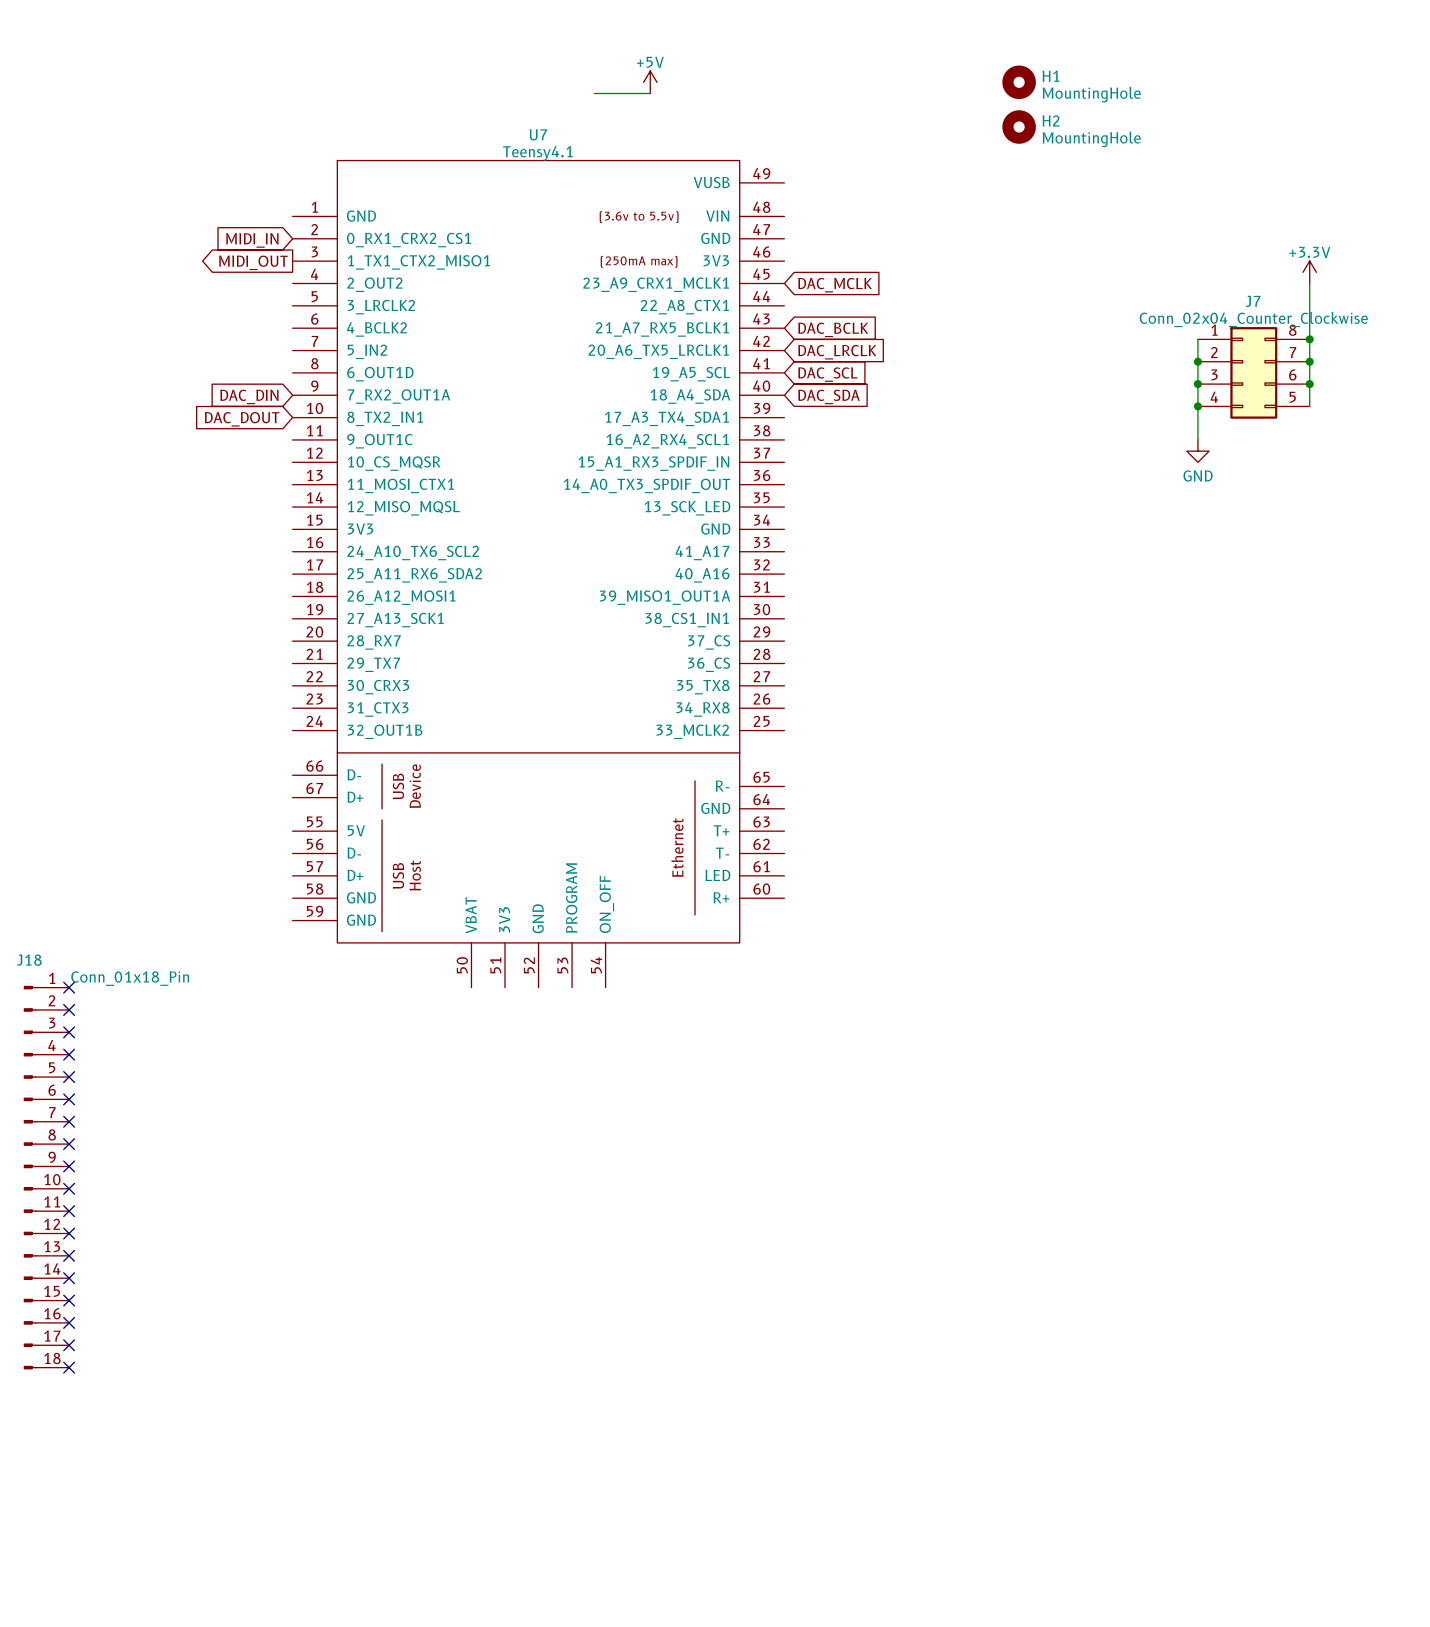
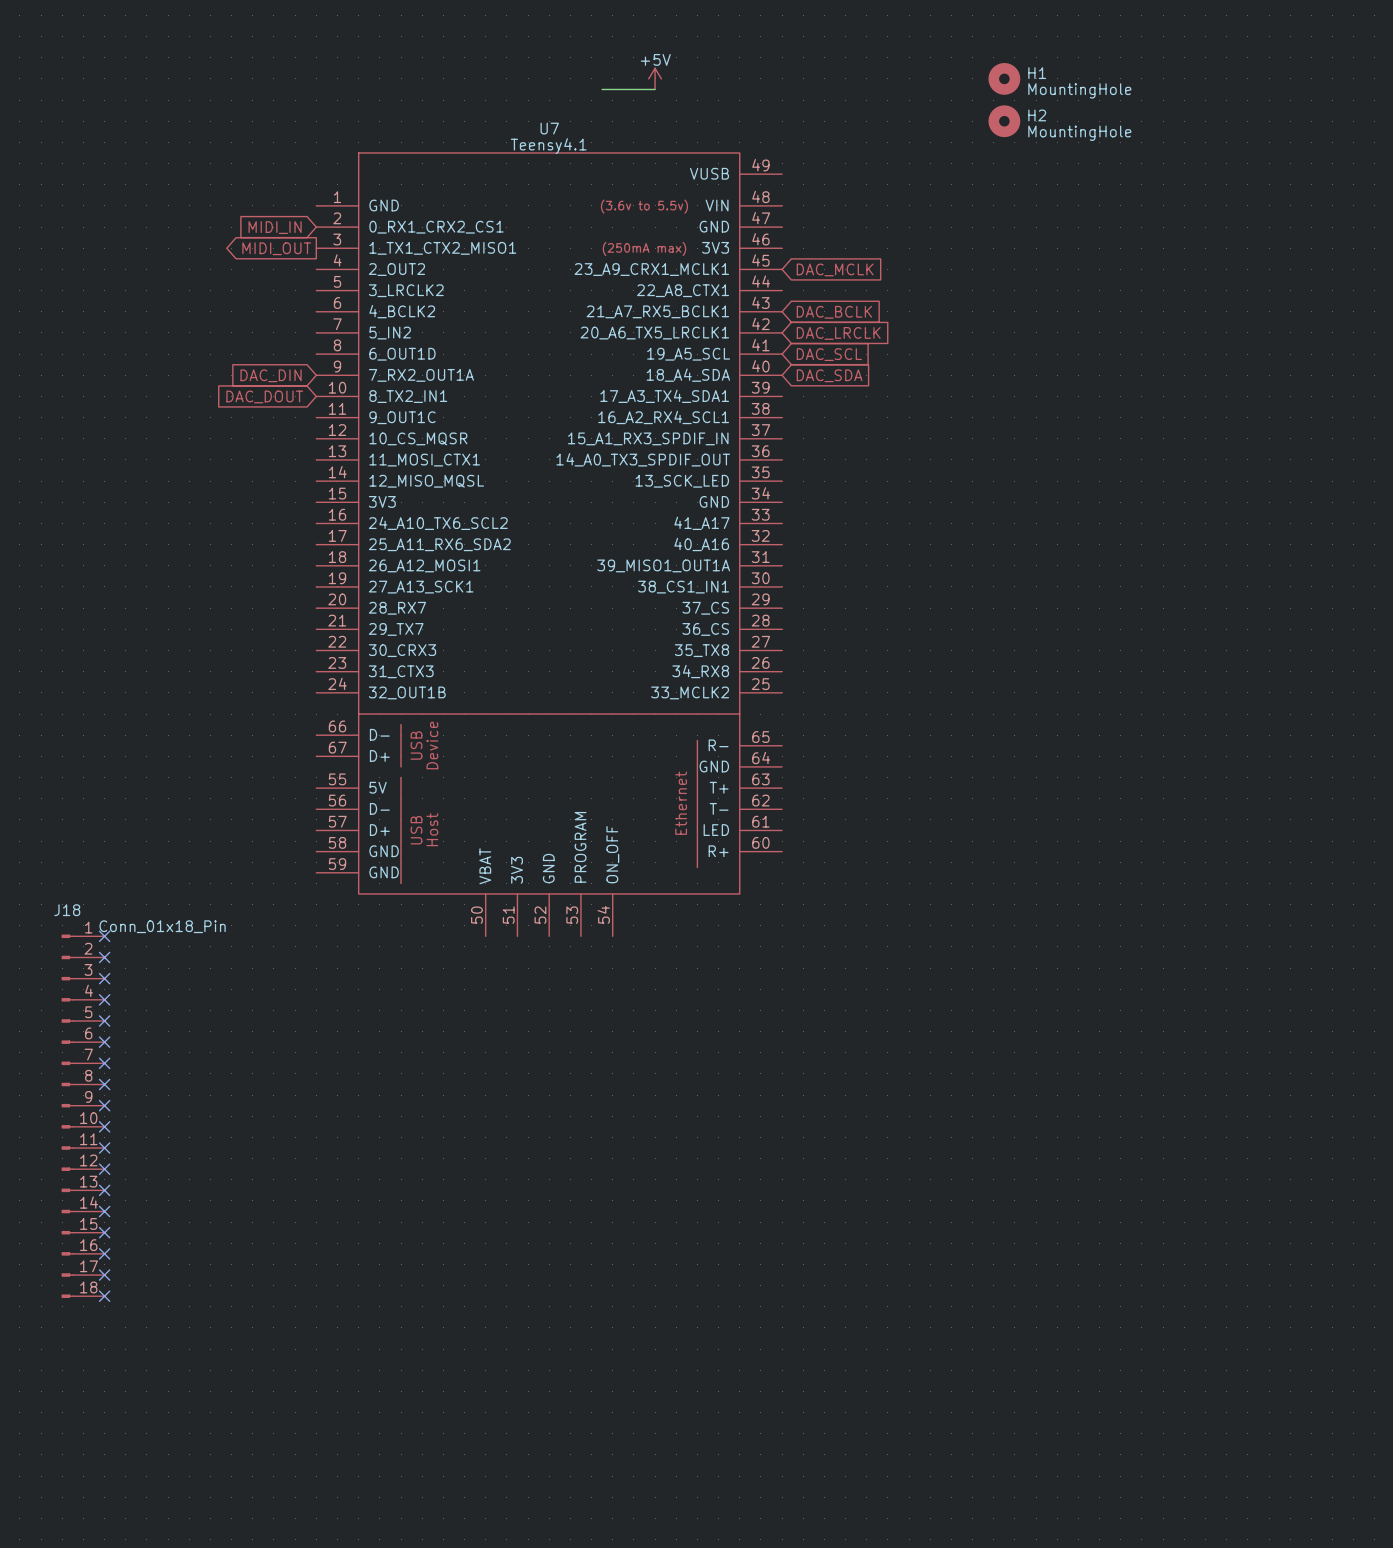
power symbol: +3.3V (1309, 272) -> none
wire: (1309, 283) (1309, 406) -> none
wire: (1197, 339) (1197, 439) -> none
junction: (1309, 339) -> none
junction: (1197, 361) -> none
junction: (1309, 361) -> none
J7: Conn_02x04_Counter_Clockwise (1253, 372) -> none
junction: (1197, 384) -> none
junction: (1309, 384) -> none
junction: (1197, 406) -> none
power symbol: GND (1197, 451) -> none

